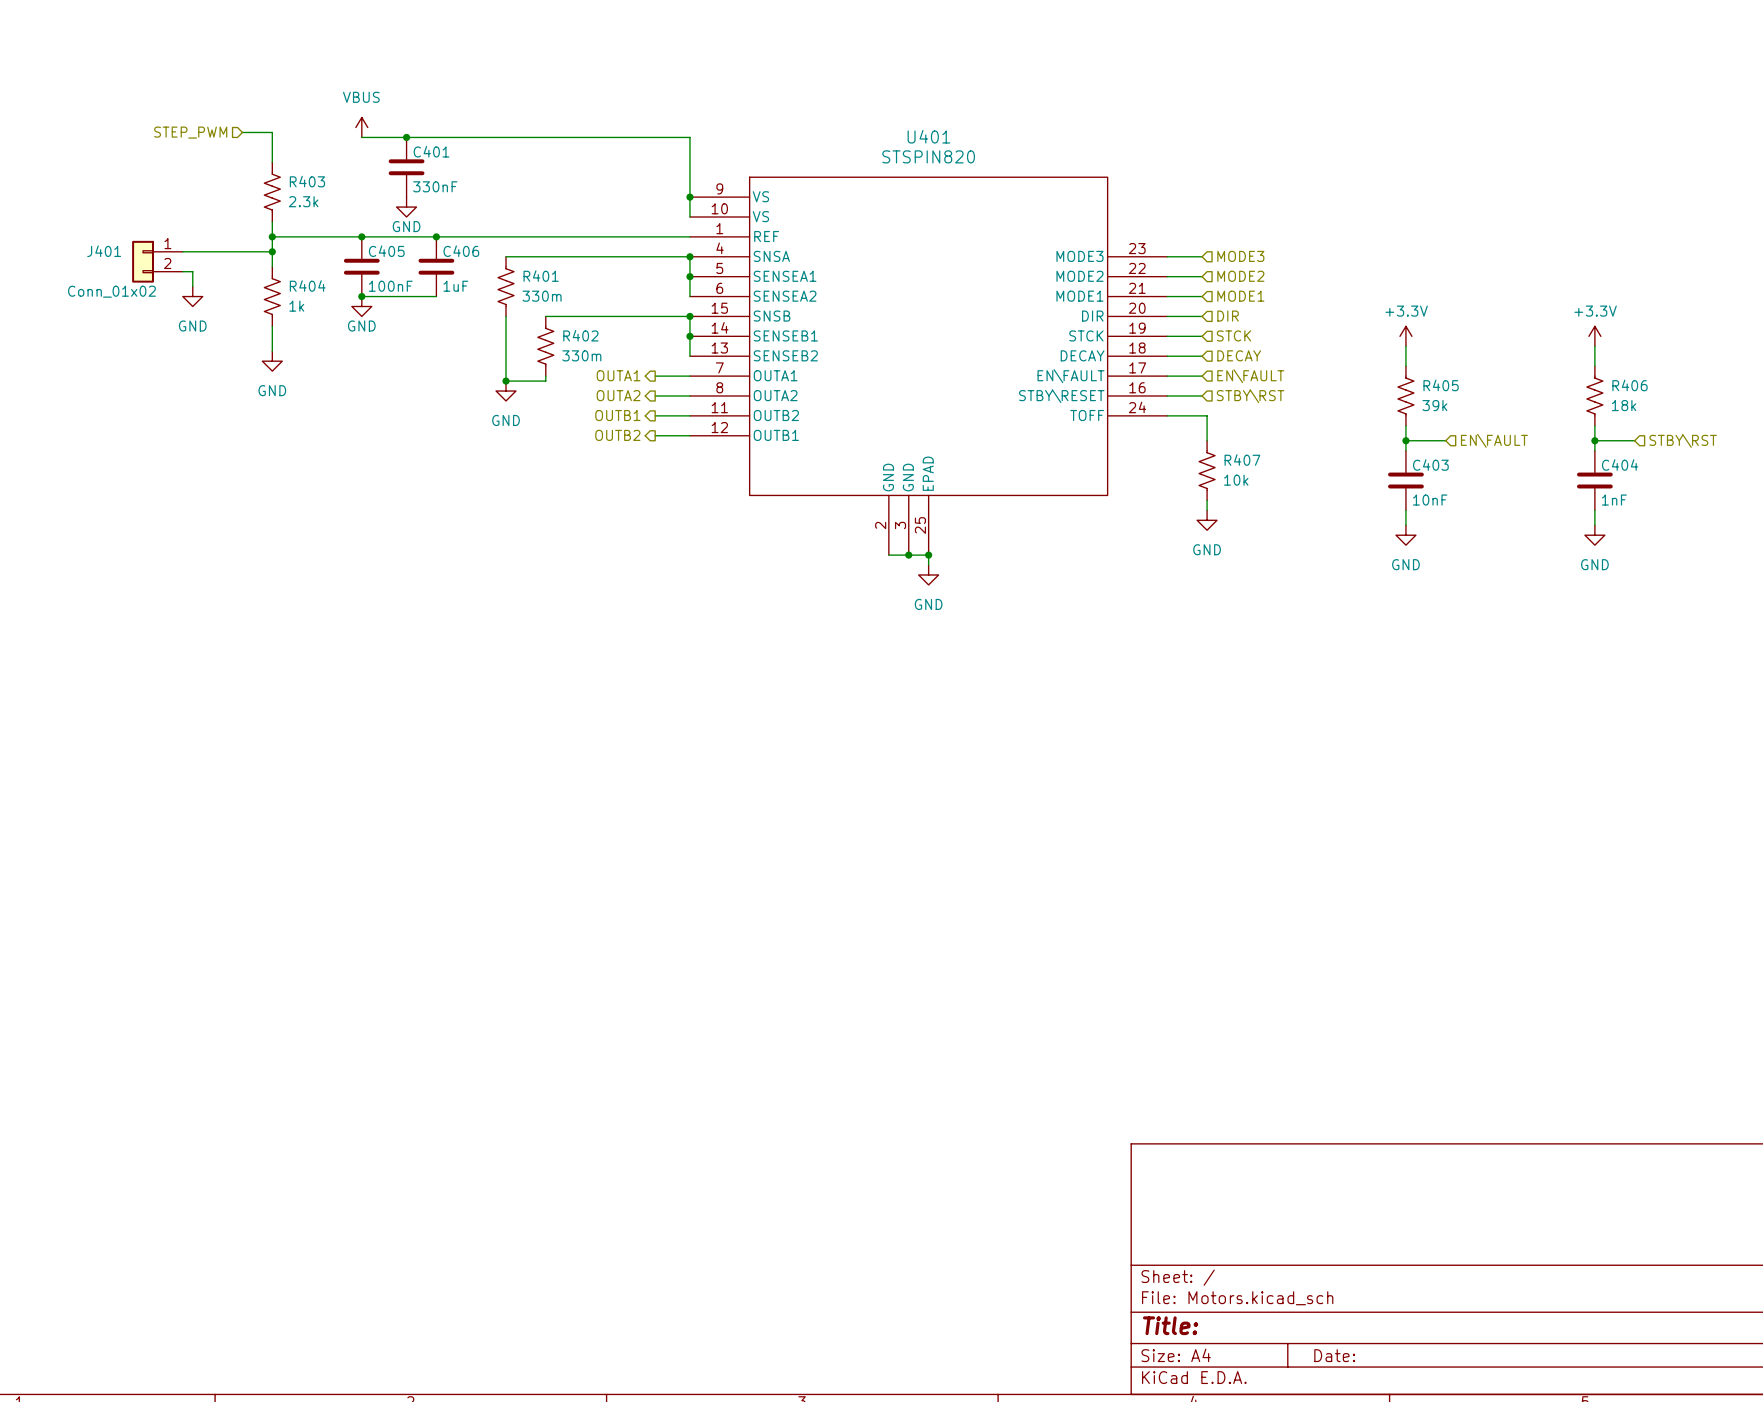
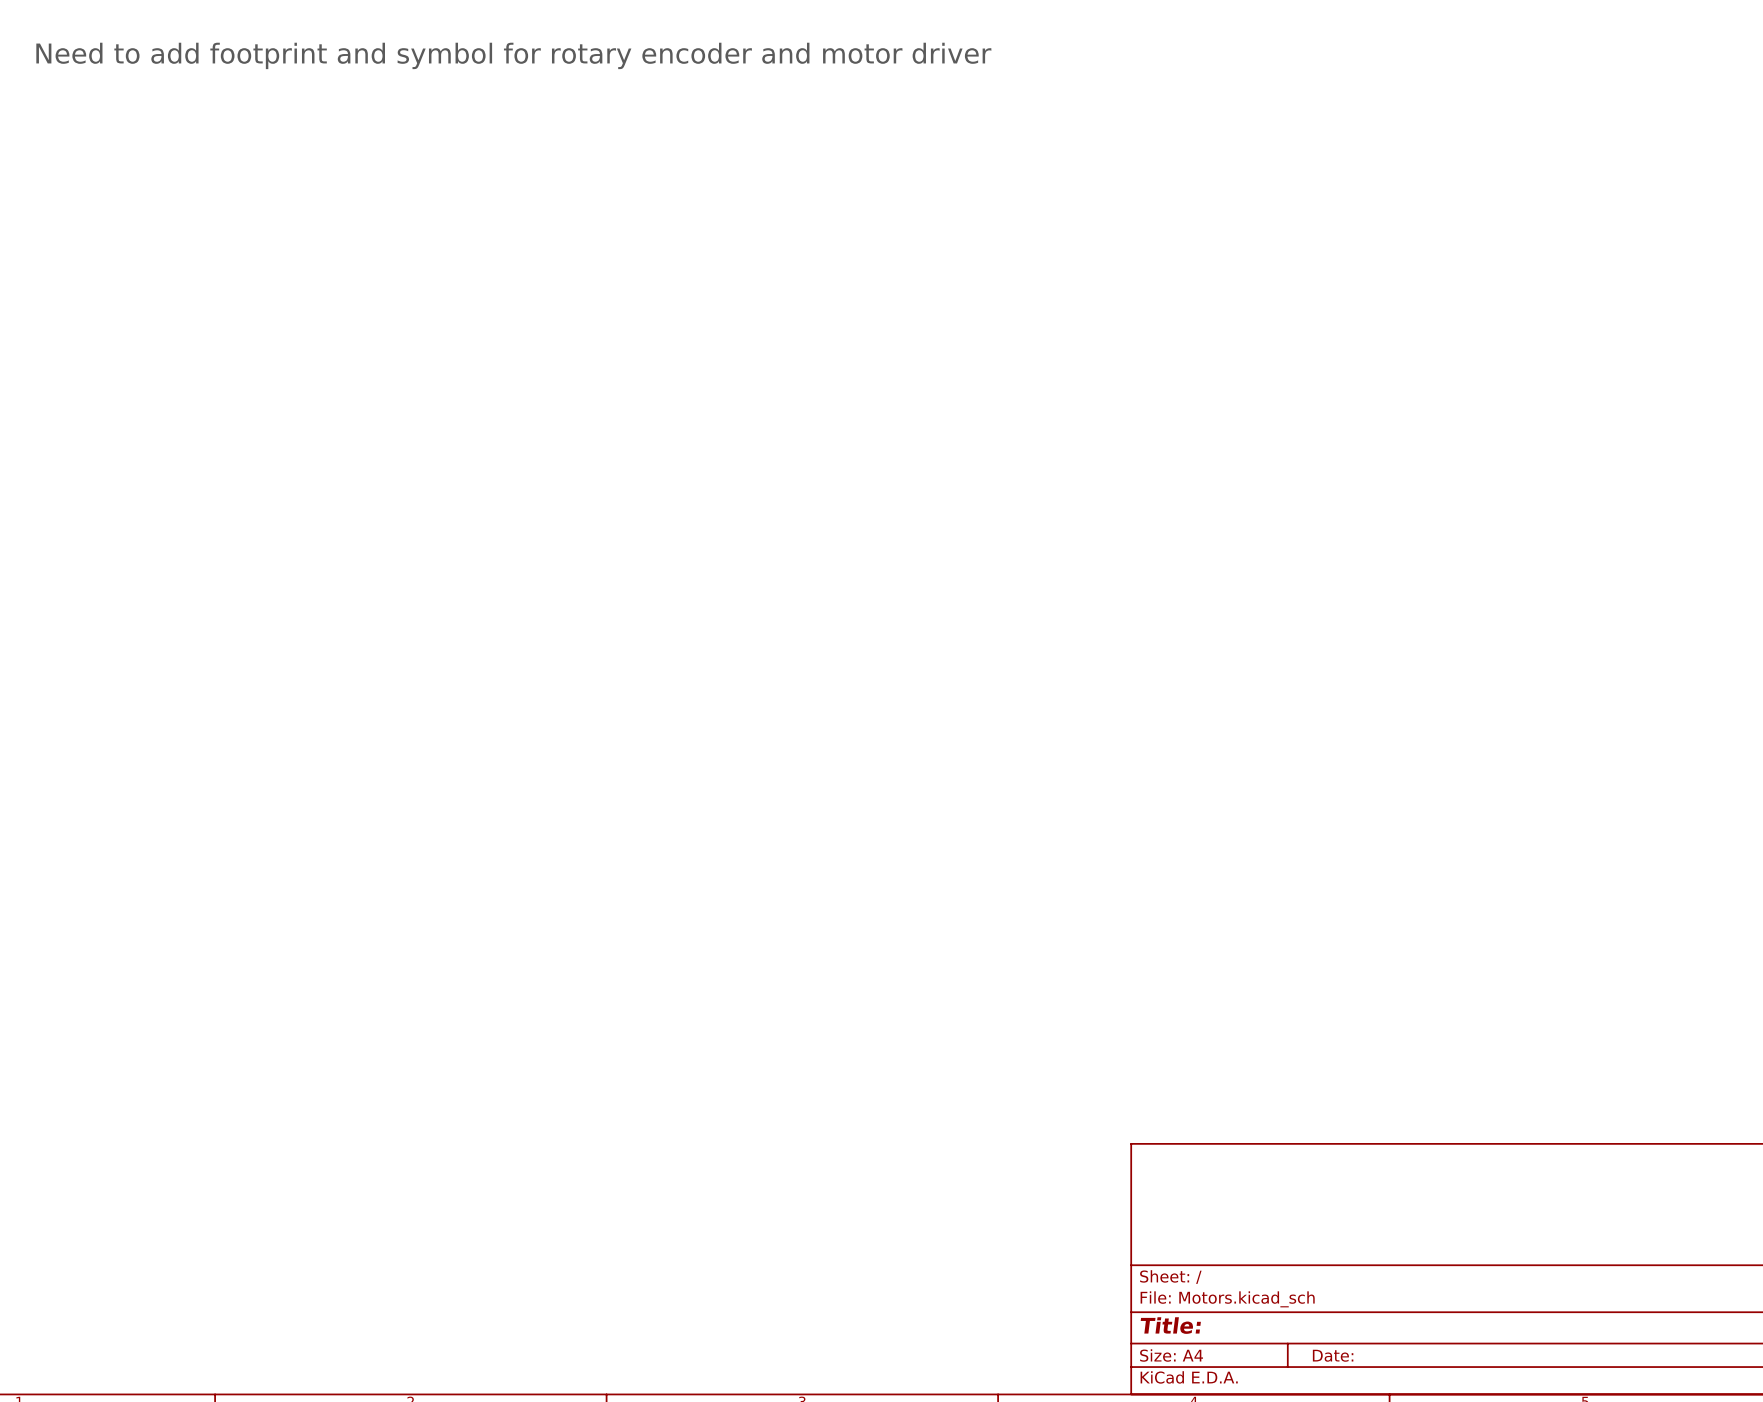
text: none -> Need to add footprint and symbol for rotary encoder and motor driver (513, 55)
power symbol: VBUS (361, 127) -> none
hierarchical label: STEP_PWM (190, 132) -> none
wire: (242, 132) (272, 132) (272, 162) -> none
wire: (361, 137) (689, 137) (689, 217) -> none
junction: (406, 137) -> none
C401: 330nF (406, 167) -> none
R403: 2.3k (272, 192) -> none
junction: (689, 197) -> none
power symbol: GND (406, 207) -> none
wire: (272, 221) (272, 266) -> none
wire: (272, 236) (689, 236) -> none
junction: (272, 236) -> none
junction: (361, 236) -> none
junction: (436, 236) -> none
wire: (182, 251) (272, 251) -> none
junction: (272, 251) -> none
wire: (506, 256) (689, 256) (689, 296) -> none
junction: (689, 256) -> none
wire: (1167, 256) (1202, 256) -> none
hierarchical label: MODE3 (1240, 256) -> none
J401: Conn_01x02 (157, 261) -> none
C405: 100nF (361, 266) -> none
C406: 1uF (436, 266) -> none
wire: (182, 271) (192, 271) (192, 286) -> none
junction: (689, 276) -> none
wire: (1167, 276) (1202, 276) -> none
hierarchical label: MODE2 (1240, 276) -> none
R401: 330m (506, 286) -> none
power symbol: GND (192, 296) -> none
R404: 1k (272, 296) -> none
wire: (361, 296) (436, 296) -> none
junction: (361, 296) -> none
wire: (1167, 296) (1202, 296) -> none
hierarchical label: MODE1 (1240, 296) -> none
power symbol: GND (361, 306) -> none
wire: (506, 316) (506, 381) (545, 381) (545, 376) -> none
wire: (545, 316) (689, 316) (689, 356) -> none
junction: (689, 316) -> none
wire: (1167, 316) (1202, 316) -> none
hierarchical label: DIR (1228, 316) -> none
wire: (272, 326) (272, 351) -> none
hierarchical label: STCK (1233, 335) -> none
junction: (689, 336) -> none
wire: (1167, 336) (1202, 336) -> none
power symbol: +3.3V (1405, 336) -> none
power symbol: +3.3V (1594, 336) -> none
R402: 330m (545, 346) -> none
wire: (1405, 346) (1405, 366) -> none
wire: (1594, 346) (1594, 366) -> none
hierarchical label: DECAY (1239, 355) -> none
wire: (1167, 356) (1202, 356) -> none
power symbol: GND (272, 361) -> none
U401: STSPIN820 (928, 366) -> none
hierarchical label: OUTA1 (618, 375) -> none
wire: (655, 376) (689, 376) -> none
wire: (1167, 376) (1202, 376) -> none
hierarchical label: EN\FAULT (1250, 376) -> none
junction: (506, 381) -> none
power symbol: GND (506, 391) -> none
hierarchical label: OUTA2 (618, 395) -> none
wire: (655, 395) (689, 395) -> none
wire: (1167, 395) (1202, 395) -> none
R405: 39k (1405, 395) -> none
R406: 18k (1594, 395) -> none
hierarchical label: STBY\RST (1250, 396) -> none
hierarchical label: OUTB1 (617, 415) -> none
wire: (655, 415) (689, 415) -> none
wire: (1167, 415) (1207, 415) (1207, 440) -> none
wire: (1405, 425) (1405, 450) -> none
wire: (1594, 425) (1594, 450) -> none
hierarchical label: OUTB2 (617, 435) -> none
wire: (655, 435) (689, 435) -> none
wire: (1405, 440) (1445, 440) -> none
junction: (1405, 440) -> none
hierarchical label: EN\FAULT (1494, 440) -> none
wire: (1594, 440) (1634, 440) -> none
junction: (1594, 440) -> none
hierarchical label: STBY\RST (1683, 440) -> none
R407: 10k (1207, 470) -> none
C403: 10nF (1405, 480) -> none
C404: 1nF (1594, 480) -> none
wire: (1207, 500) (1207, 510) -> none
wire: (1405, 510) (1405, 525) -> none
wire: (1594, 510) (1594, 525) -> none
power symbol: GND (1207, 520) -> none
power symbol: GND (1405, 535) -> none
power symbol: GND (1594, 535) -> none
wire: (888, 555) (928, 555) (928, 565) -> none
junction: (908, 555) -> none
junction: (928, 555) -> none
power symbol: GND (928, 574) -> none

